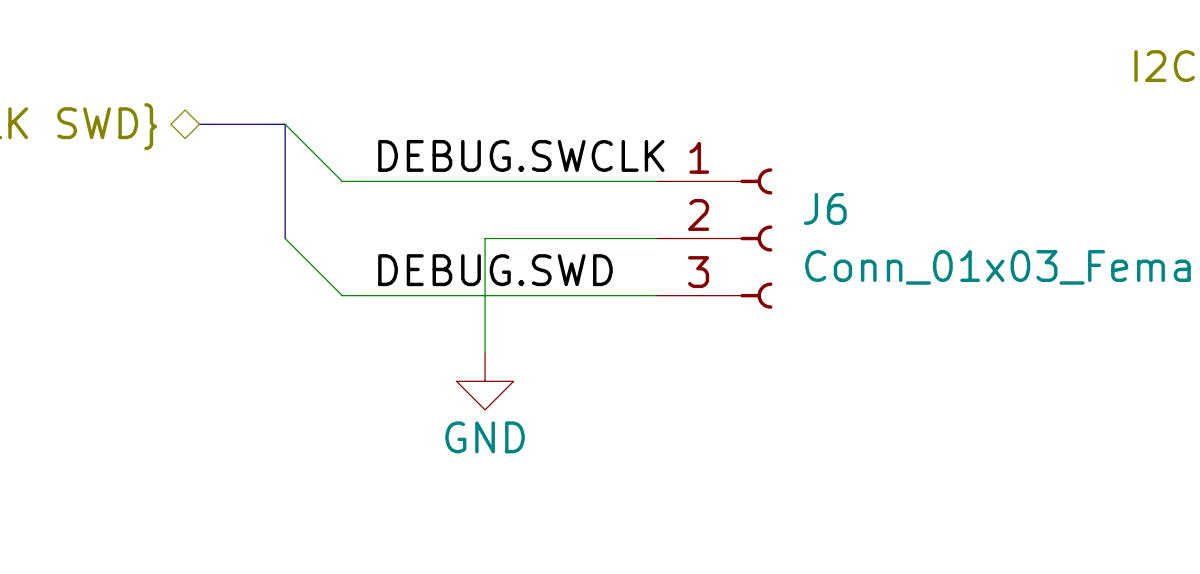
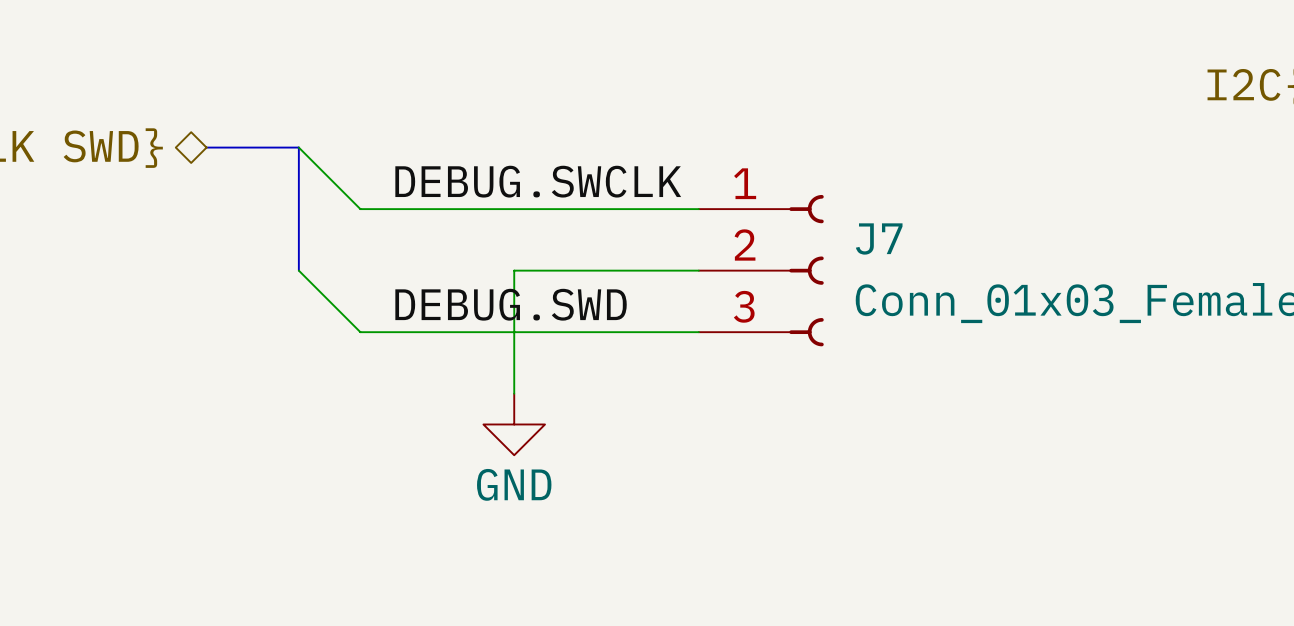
J6 name: J6 (825, 208) -> J7 (879, 238)

